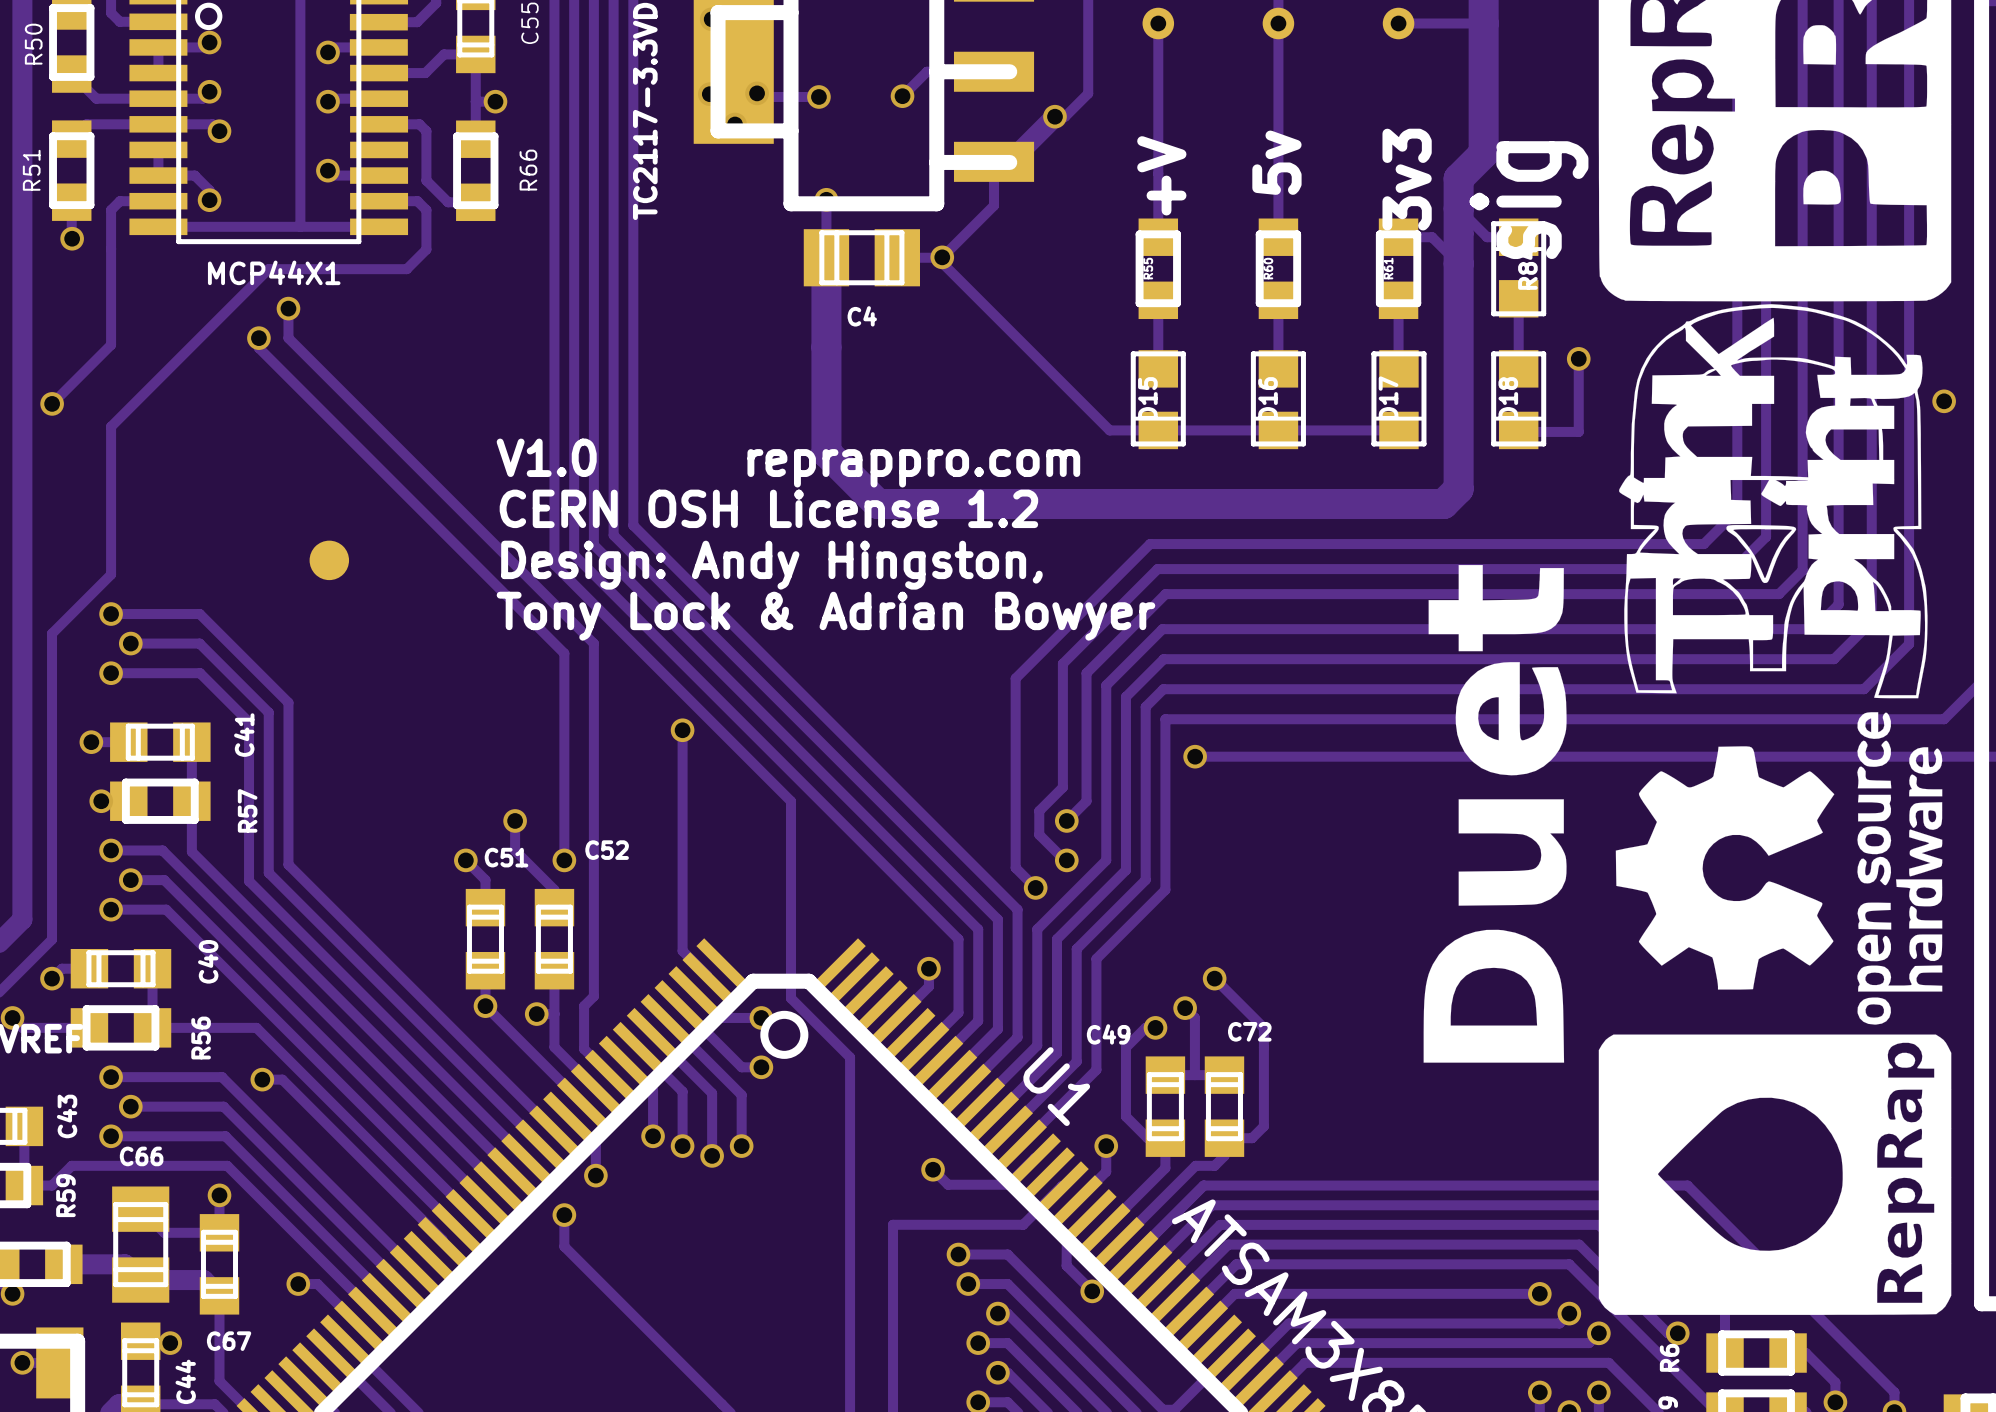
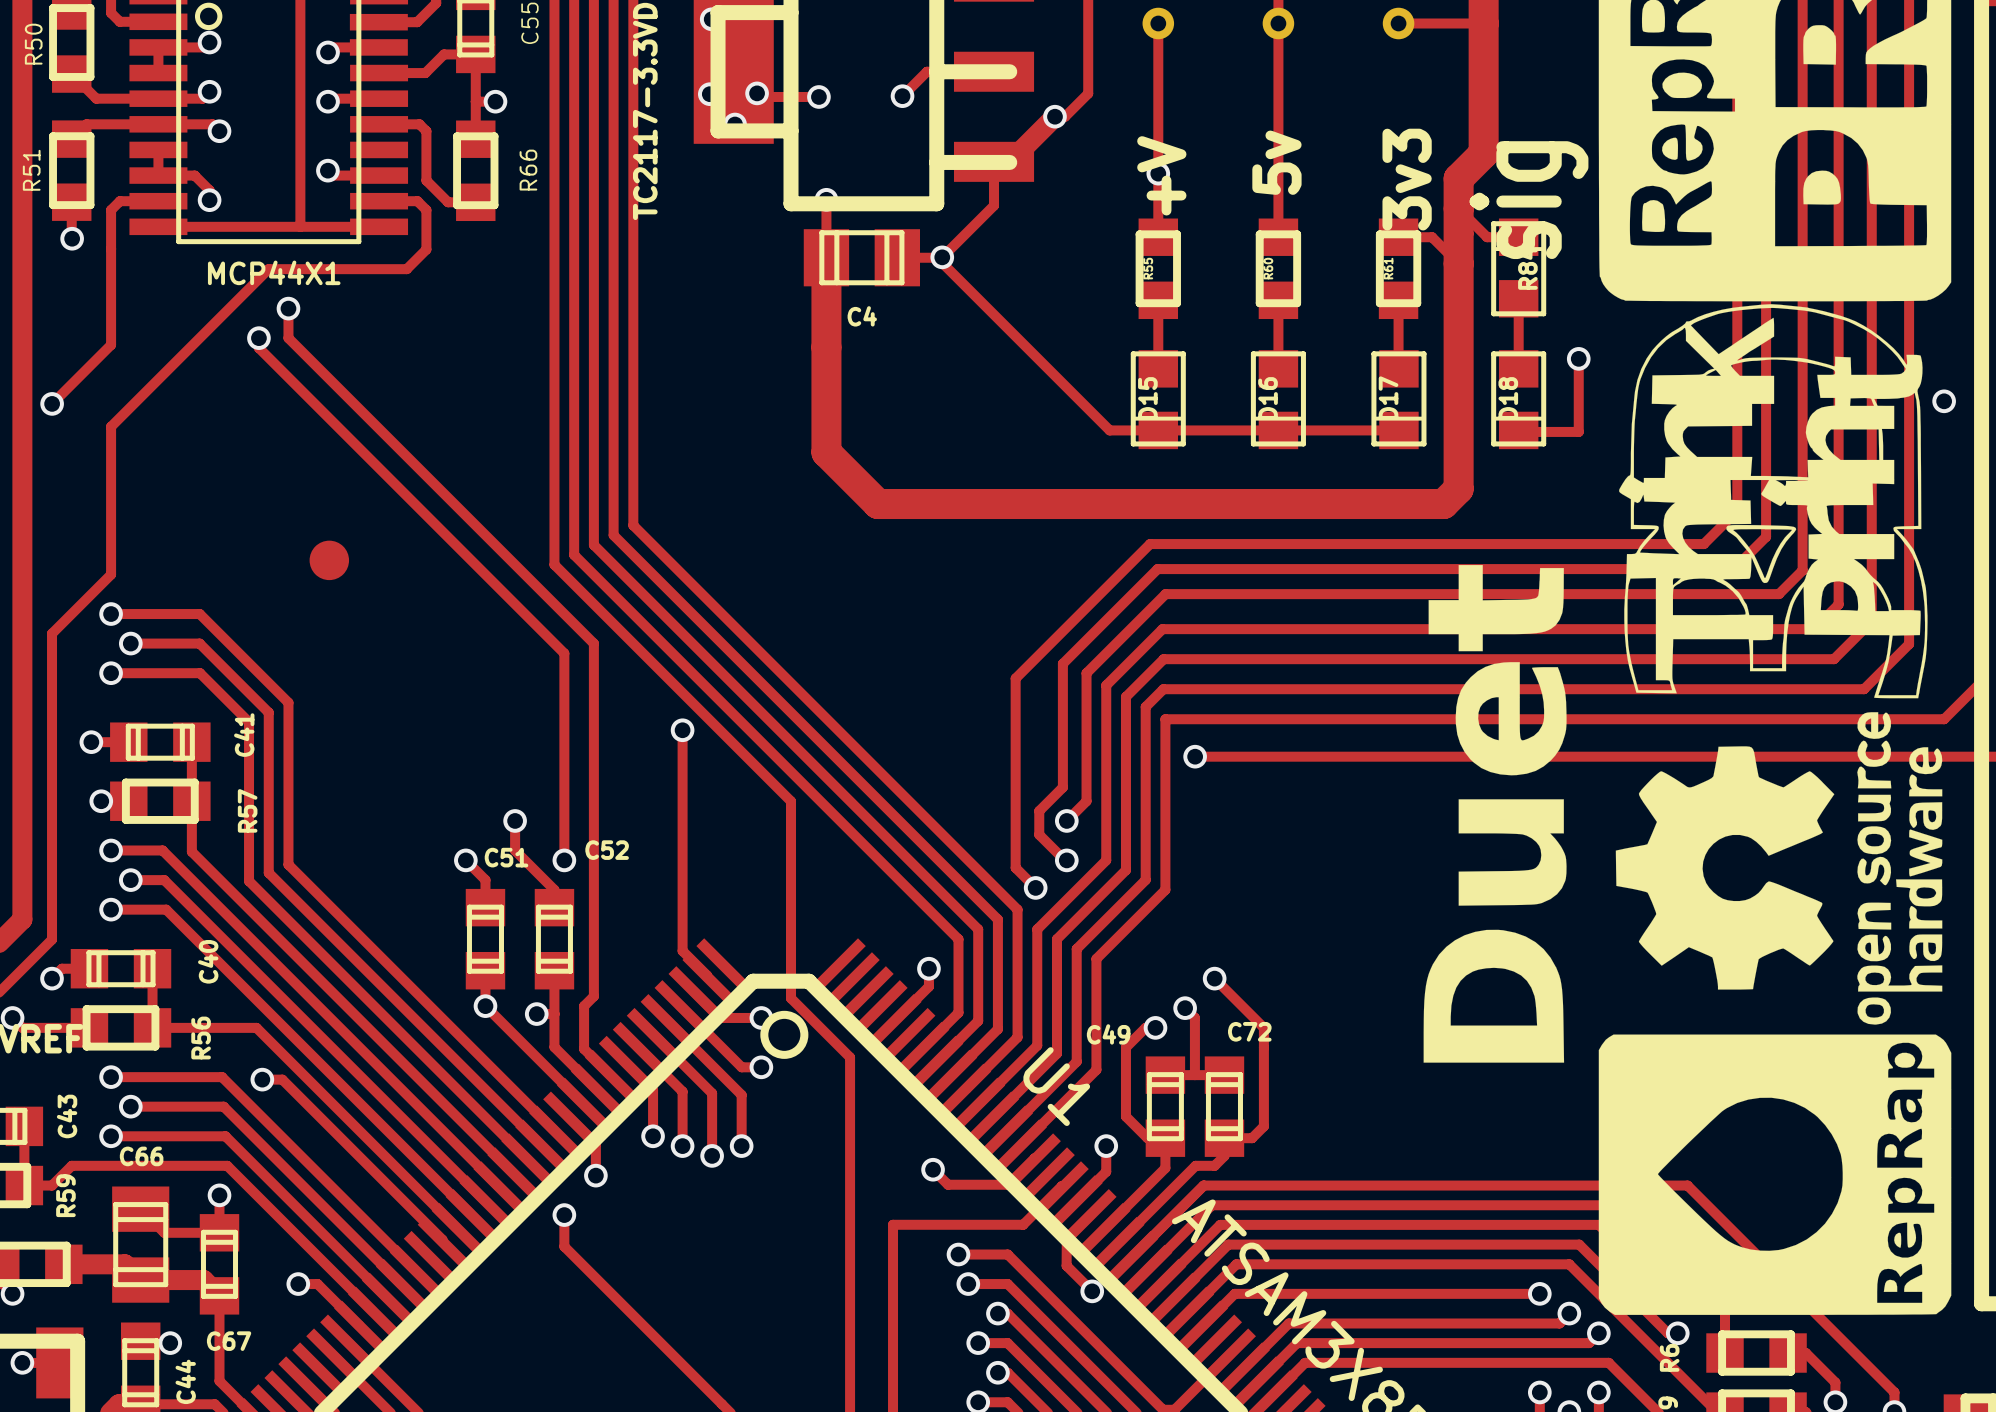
via: none -> (1158, 173)
text: V1.0 reprappro.com (788, 463) -> none
text: CERN OSH License 1.2 (768, 508) -> none
text: Design: Andy Hingston, (771, 565) -> none
text: Tony Lock & Adrian Bowyer (825, 616) -> none

